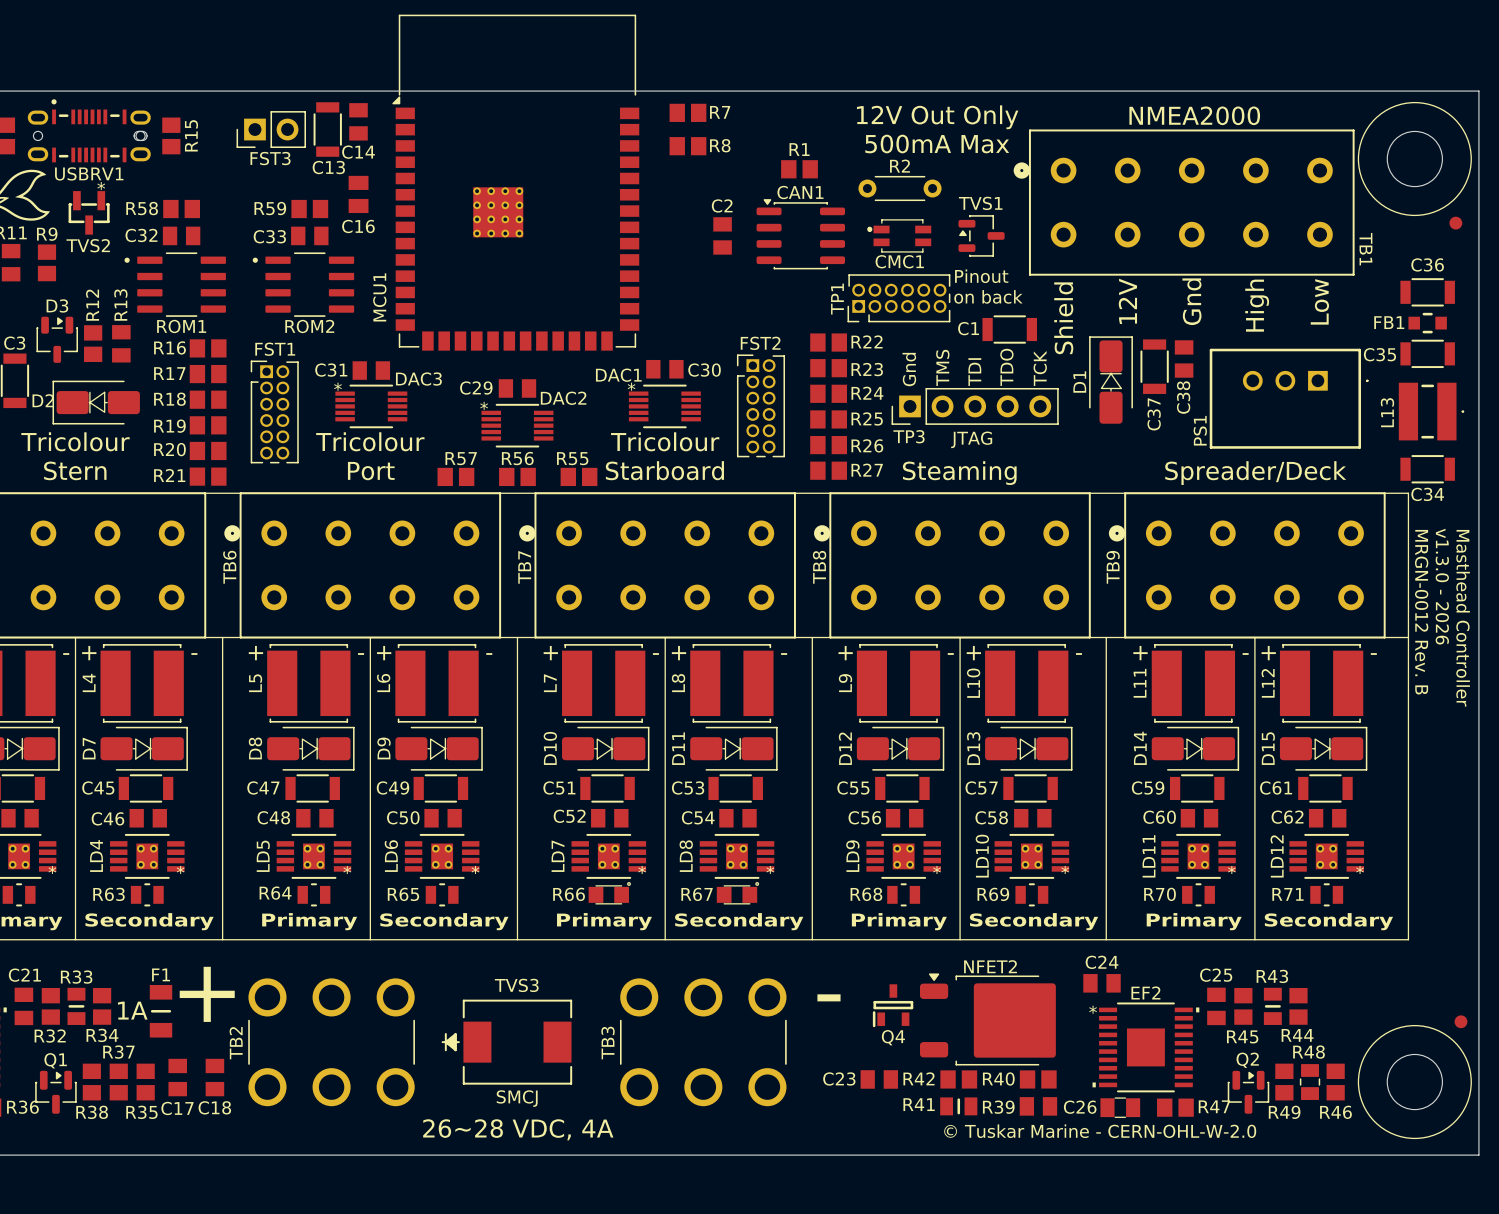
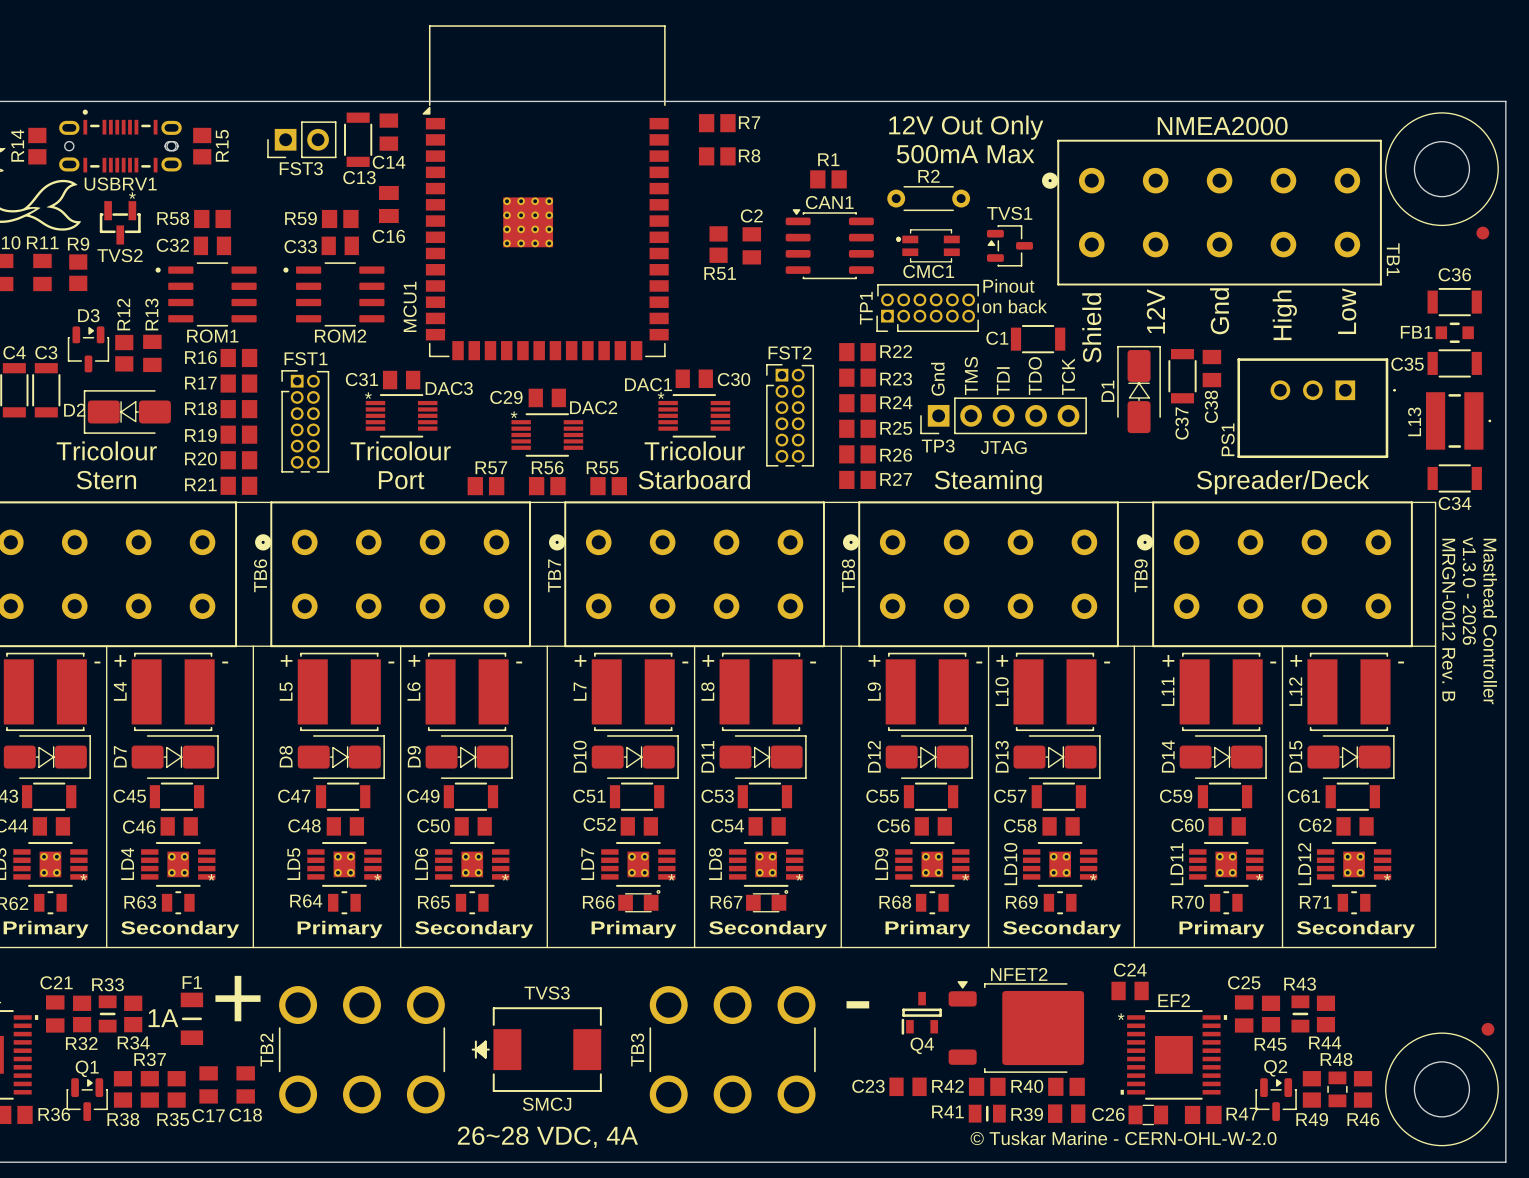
R51: none -> (718, 244)

